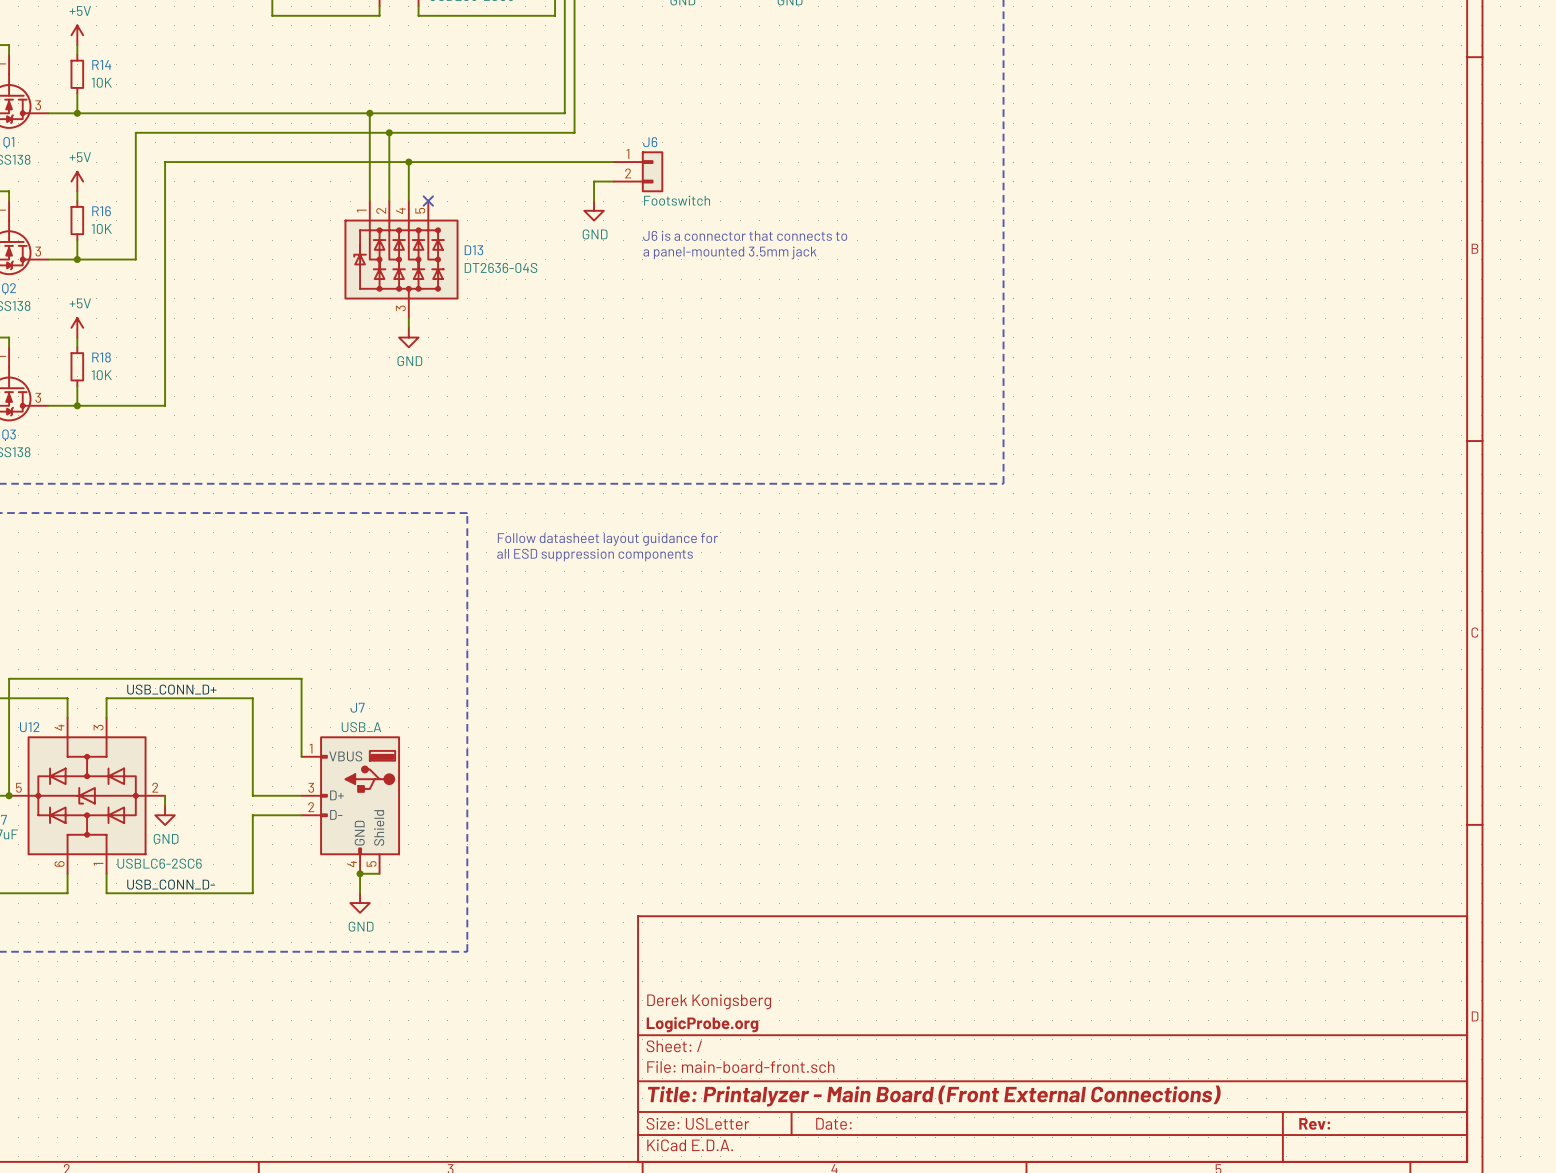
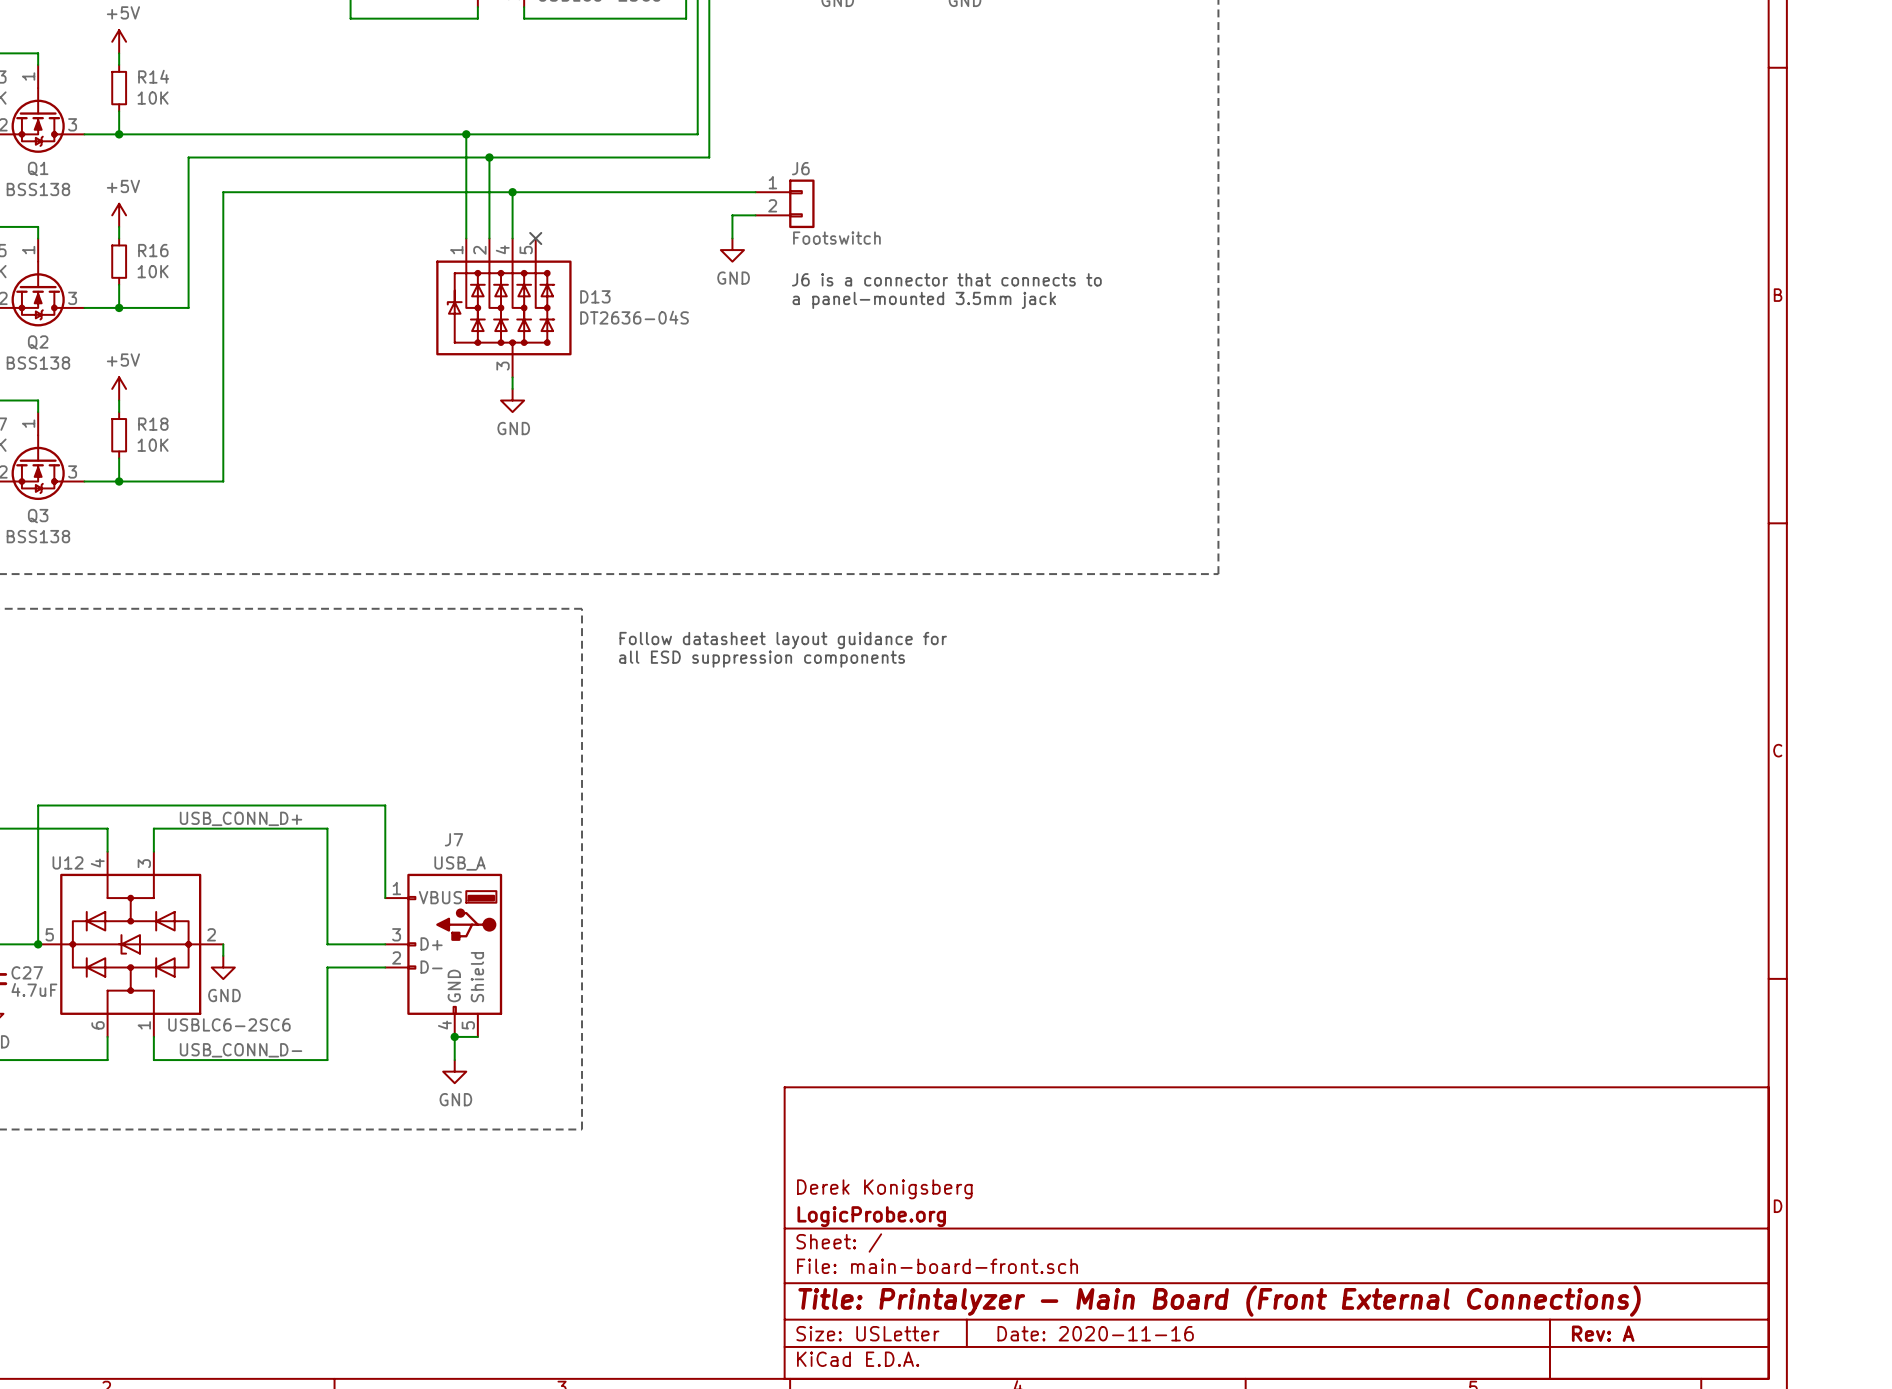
title block: Date: (833, 1123) -> Date: 2020-11-16 (1095, 1333)
title block: Rev: (1314, 1123) -> Rev: A (1603, 1333)

